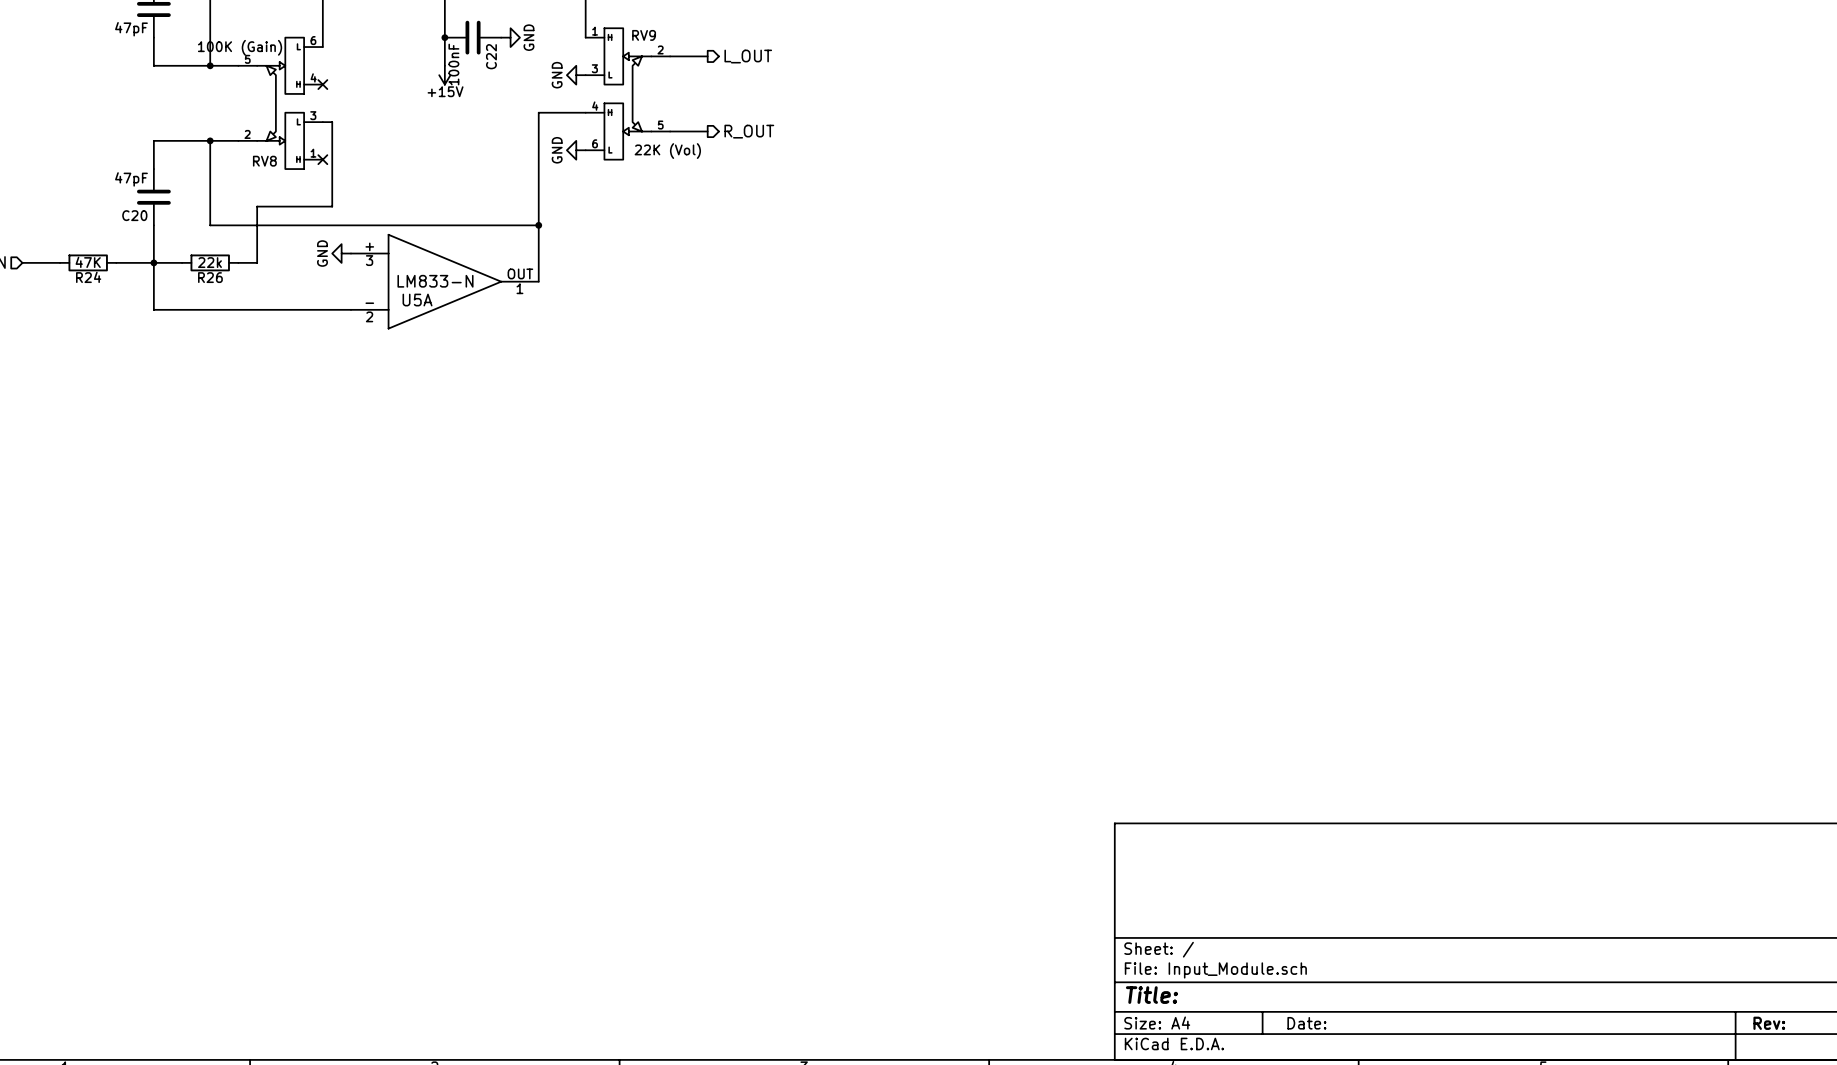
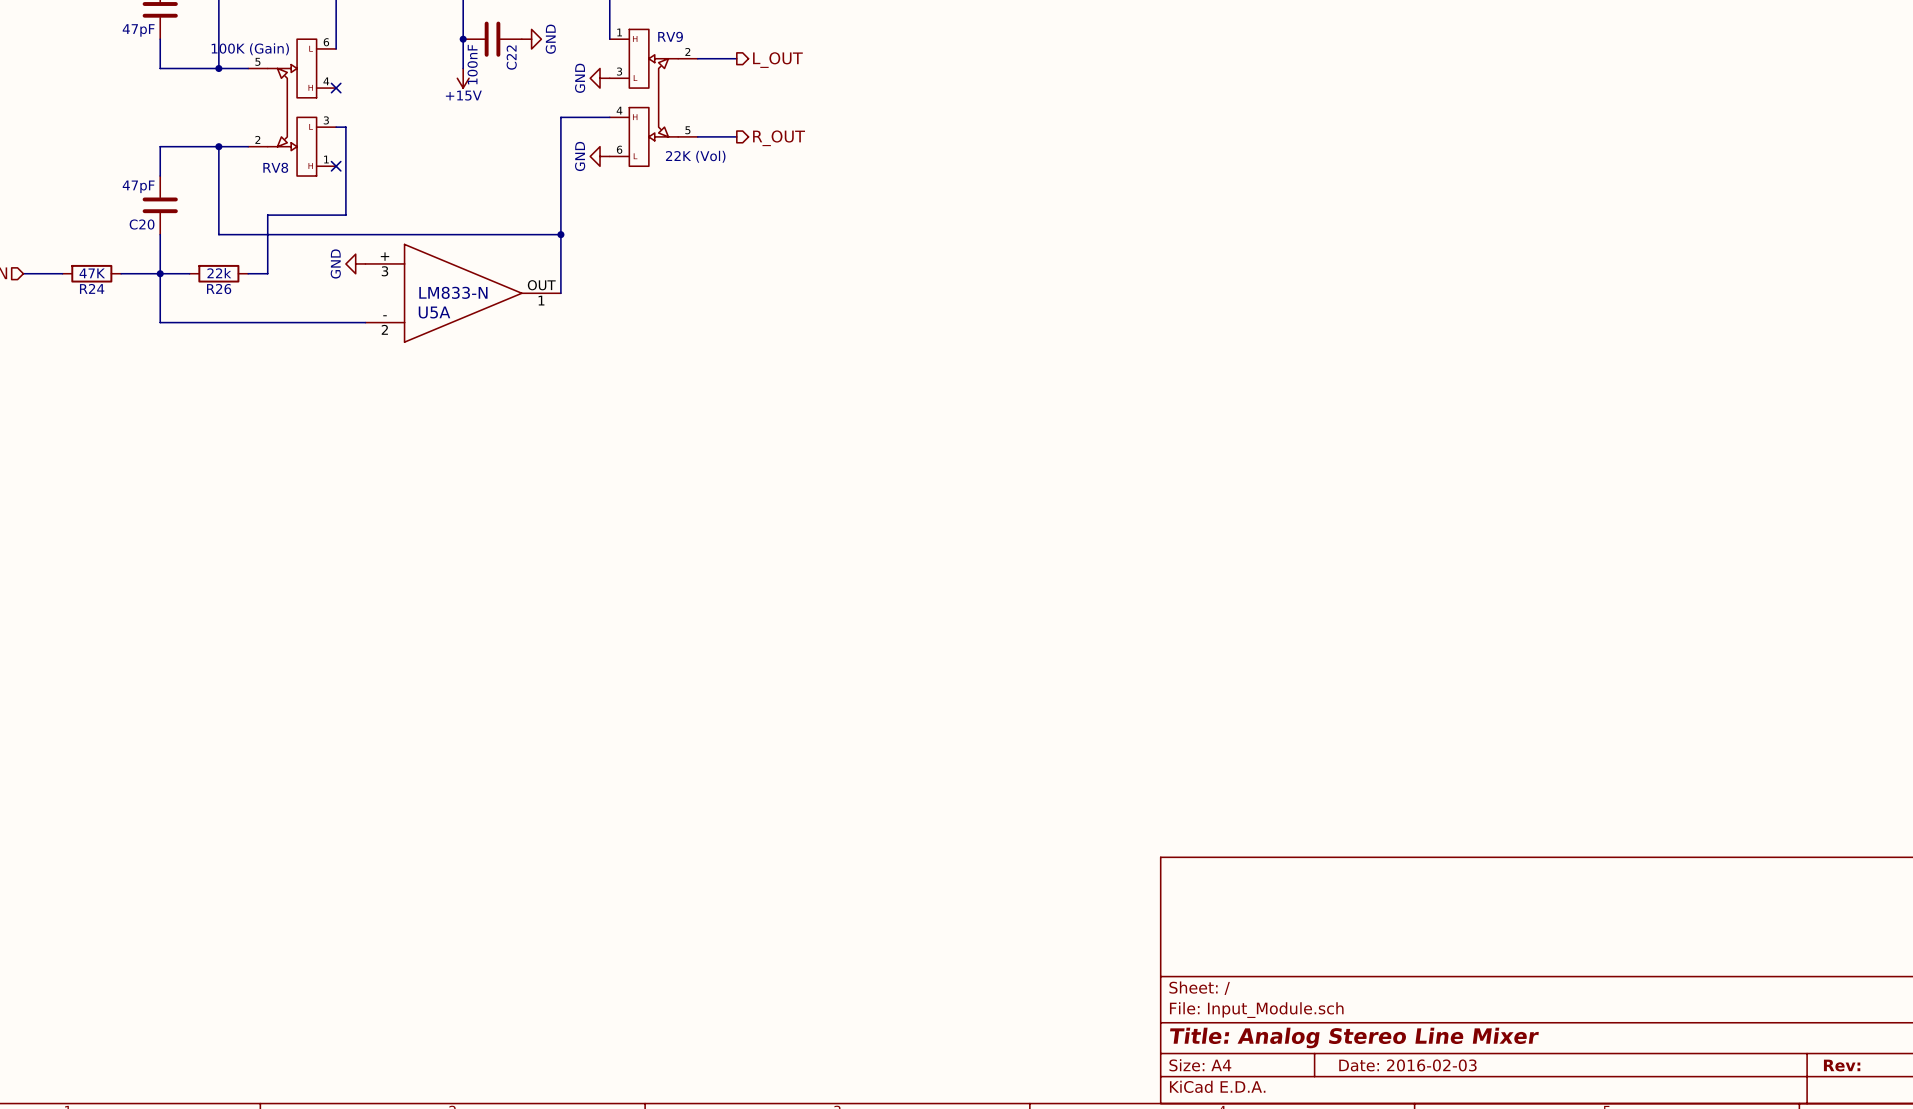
title block: Title: (1151, 995) -> Title: Analog Stereo Line Mixer (1354, 1037)
title block: Date: (1306, 1023) -> Date: 2016-02-03 (1407, 1065)

